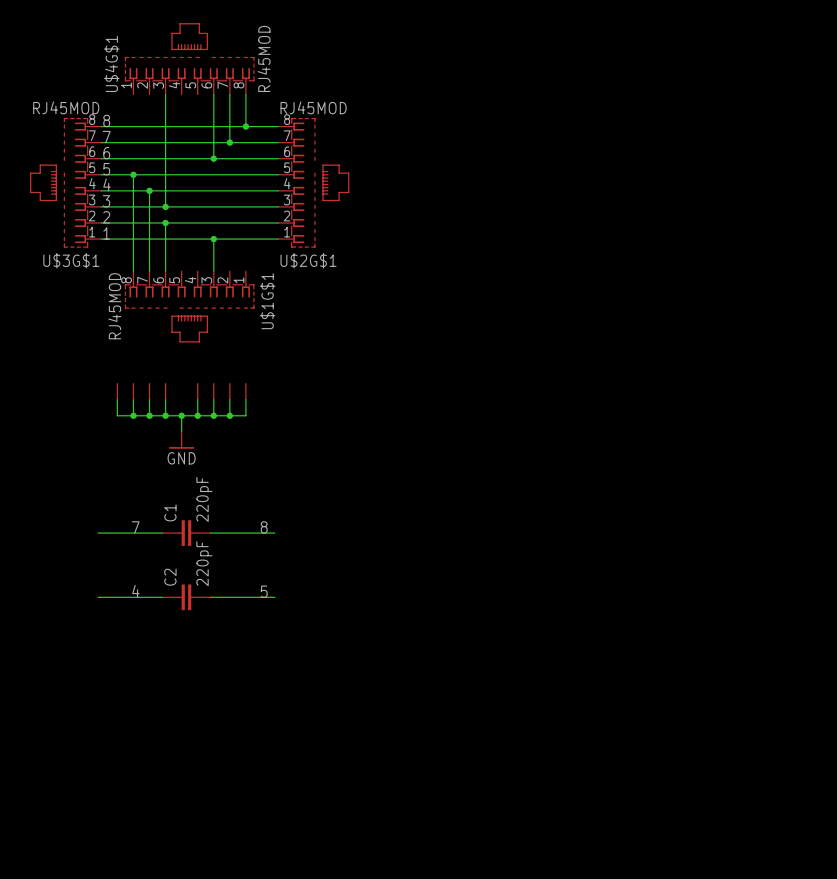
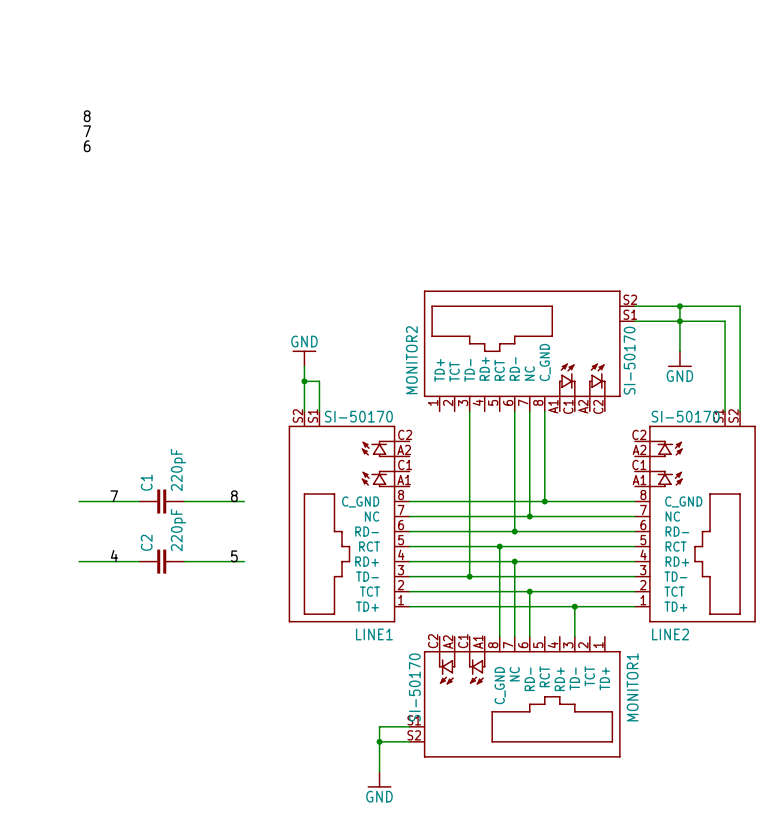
U$4G$1: RJ45MOD (189, 58) -> none
wire: (165, 94) (165, 206) -> none
wire: (213, 94) (213, 158) -> none
wire: (229, 94) (229, 142) -> none
wire: (245, 94) (245, 126) -> none
wire: (101, 126) (278, 126) -> none
junction: (245, 126) -> none
wire: (101, 142) (278, 142) -> none
junction: (229, 142) -> none
wire: (101, 158) (278, 158) -> none
junction: (213, 158) -> none
label: 5 (106, 169) -> none
wire: (101, 174) (278, 174) -> none
wire: (133, 174) (133, 271) -> none
junction: (133, 174) -> none
U$3G$1: RJ45MOD (65, 182) -> none
U$2G$1: RJ45MOD (313, 182) -> none
label: 4 (106, 184) -> none
wire: (101, 190) (278, 190) -> none
wire: (149, 190) (149, 271) -> none
junction: (149, 190) -> none
label: 3 (106, 201) -> none
wire: (101, 206) (278, 206) -> none
junction: (165, 206) -> none
label: 2 (106, 217) -> none
wire: (101, 222) (278, 222) -> none
wire: (165, 222) (165, 271) -> none
junction: (165, 222) -> none
label: 1 (106, 233) -> none
wire: (101, 239) (278, 239) -> none
wire: (213, 239) (213, 271) -> none
junction: (213, 239) -> none
U$1G$1: RJ45MOD (189, 306) -> none
wire: none -> (634, 306) (740, 306) (740, 411)
wire: none -> (679, 306) (679, 351)
junction: none -> (679, 306)
wire: none -> (634, 321) (725, 321) (725, 411)
junction: none -> (679, 321)
MONITOR2: none -> SI-50170 (529, 350)
power symbol: none -> GND (304, 358)
power symbol: none -> GND (679, 359)
wire: none -> (304, 366) (304, 411)
part: (117, 391) -> none
part: (133, 391) -> none
part: (149, 391) -> none
part: (165, 391) -> none
part: (197, 391) -> none
part: (213, 391) -> none
part: (229, 391) -> none
part: (245, 391) -> none
wire: (117, 399) (117, 415) (245, 415) (245, 399) -> none
wire: (133, 399) (133, 415) -> none
wire: (149, 399) (149, 415) -> none
wire: (165, 399) (165, 415) -> none
wire: (197, 399) (197, 415) -> none
wire: (213, 399) (213, 415) -> none
wire: (229, 399) (229, 415) -> none
wire: none -> (304, 381) (319, 381) (319, 411)
junction: none -> (304, 381)
junction: (133, 415) -> none
junction: (149, 415) -> none
junction: (165, 415) -> none
wire: (181, 415) (181, 431) -> none
junction: (181, 415) -> none
junction: (197, 415) -> none
junction: (213, 415) -> none
junction: (229, 415) -> none
wire: none -> (469, 411) (469, 576)
wire: none -> (514, 411) (514, 531)
wire: none -> (529, 411) (529, 516)
wire: none -> (544, 411) (544, 501)
power symbol: GND (181, 440) -> none
wire: none -> (409, 501) (634, 501)
junction: none -> (544, 501)
LINE1: none -> SI-50170 (349, 516)
wire: none -> (409, 516) (634, 516)
junction: none -> (529, 516)
LINE2: none -> SI-50170 (695, 516)
wire: none -> (409, 531) (634, 531)
junction: none -> (514, 531)
wire: none -> (409, 546) (634, 546)
wire: none -> (499, 546) (499, 636)
junction: none -> (499, 546)
wire: none -> (409, 561) (634, 561)
wire: none -> (514, 561) (514, 636)
junction: none -> (514, 561)
wire: none -> (409, 576) (634, 576)
junction: none -> (469, 576)
wire: none -> (409, 591) (634, 591)
wire: none -> (529, 591) (529, 636)
junction: none -> (529, 591)
wire: none -> (409, 606) (634, 606)
wire: none -> (574, 606) (574, 636)
junction: none -> (574, 606)
MONITOR1: none -> SI-50170 (515, 697)
wire: none -> (409, 726) (379, 726) (379, 771)
wire: none -> (379, 741) (409, 741)
junction: none -> (379, 741)
power symbol: none -> GND (379, 779)

